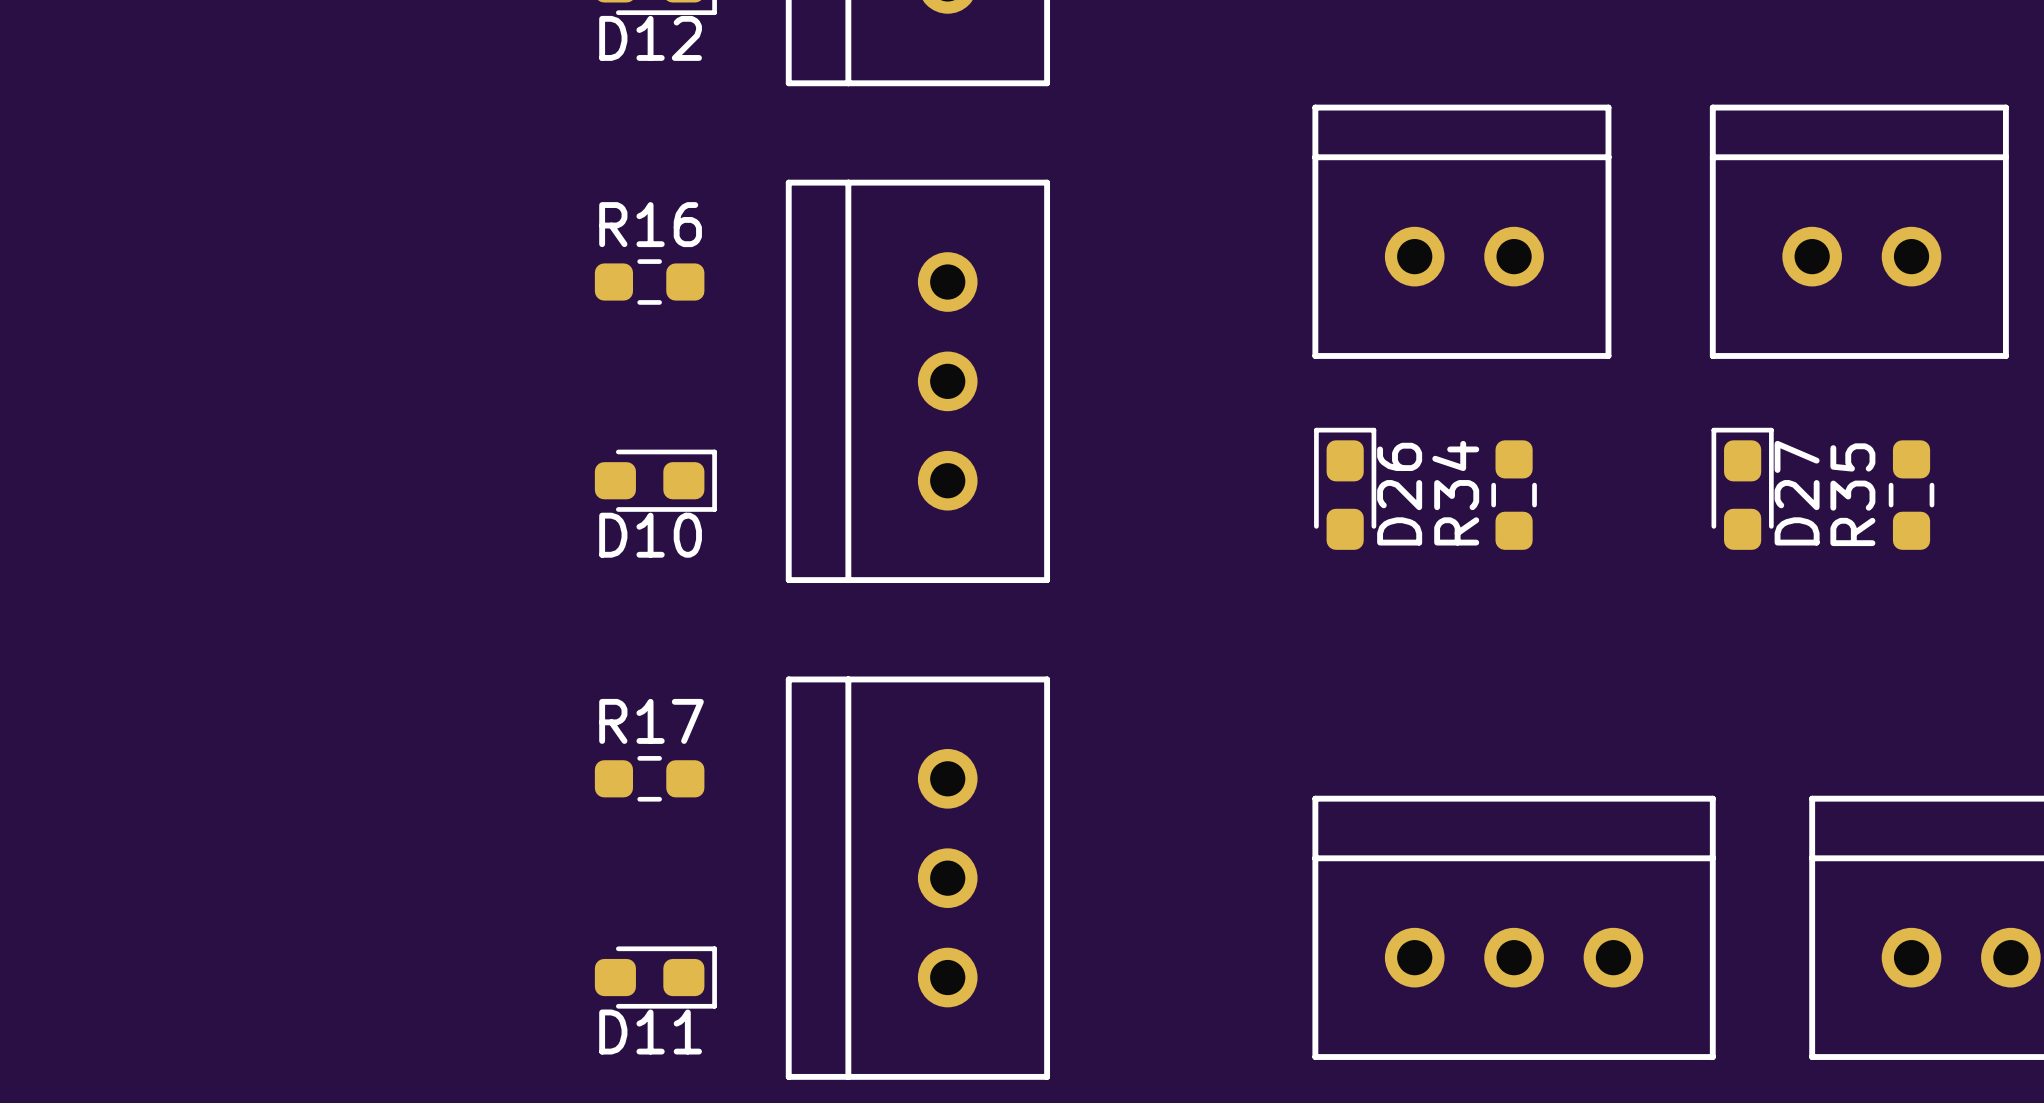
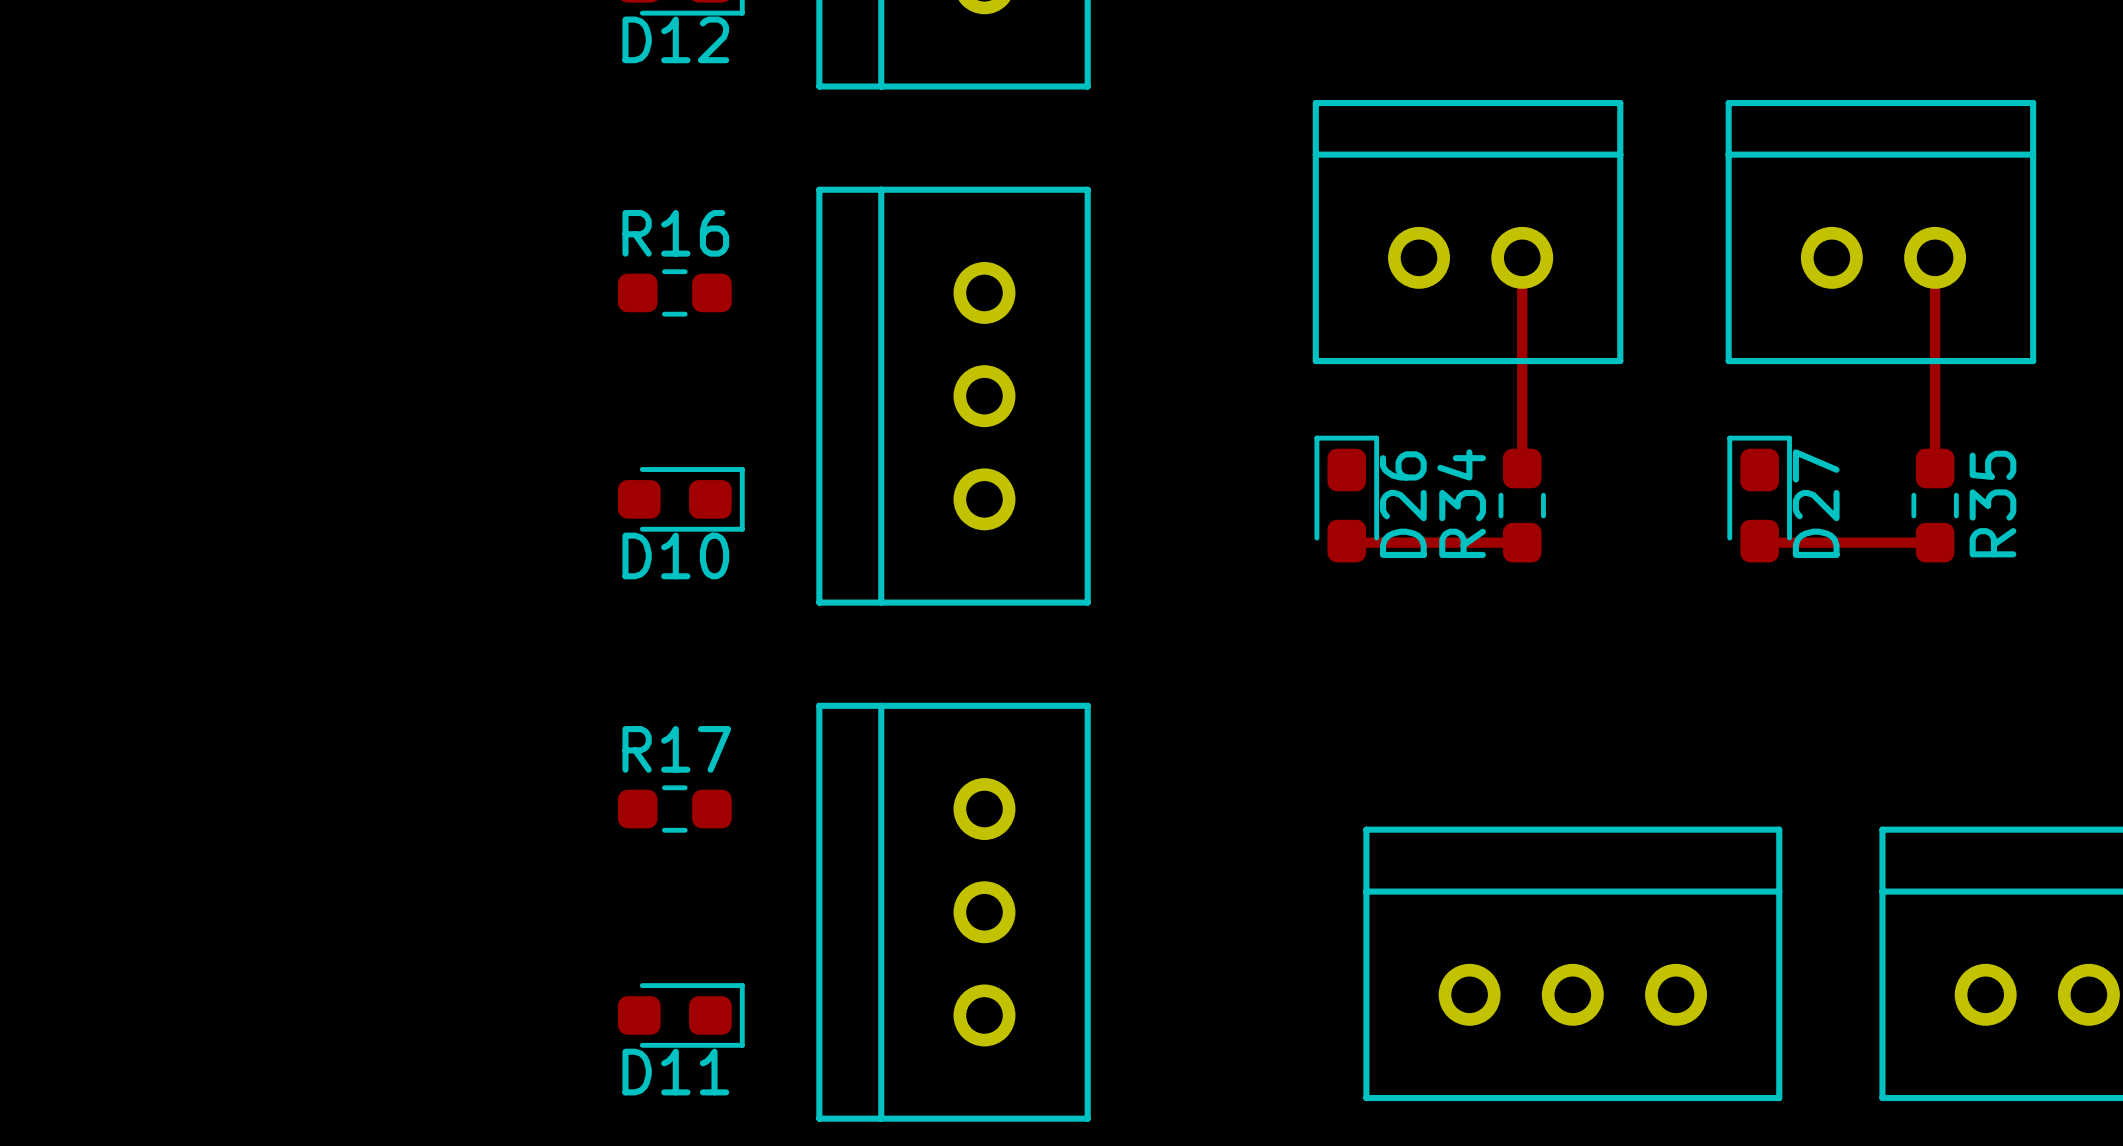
part position: (1461, 231) -> (1468, 232)
part position: (1859, 231) -> (1880, 232)
track: none -> (1522, 257) (1522, 468)
track: none -> (1935, 257) (1935, 468)
D26 position: (1345, 488) -> (1346, 499)
D27 position: (1742, 488) -> (1759, 499)
R35 name position: R35 (1852, 494) -> R35 (1992, 504)
R34 position: (1514, 495) -> (1522, 505)
R35 position: (1911, 495) -> (1935, 505)
track: none -> (1346, 541) (1348, 542) (1522, 542)
track: none -> (1759, 541) (1761, 542) (1935, 542)

